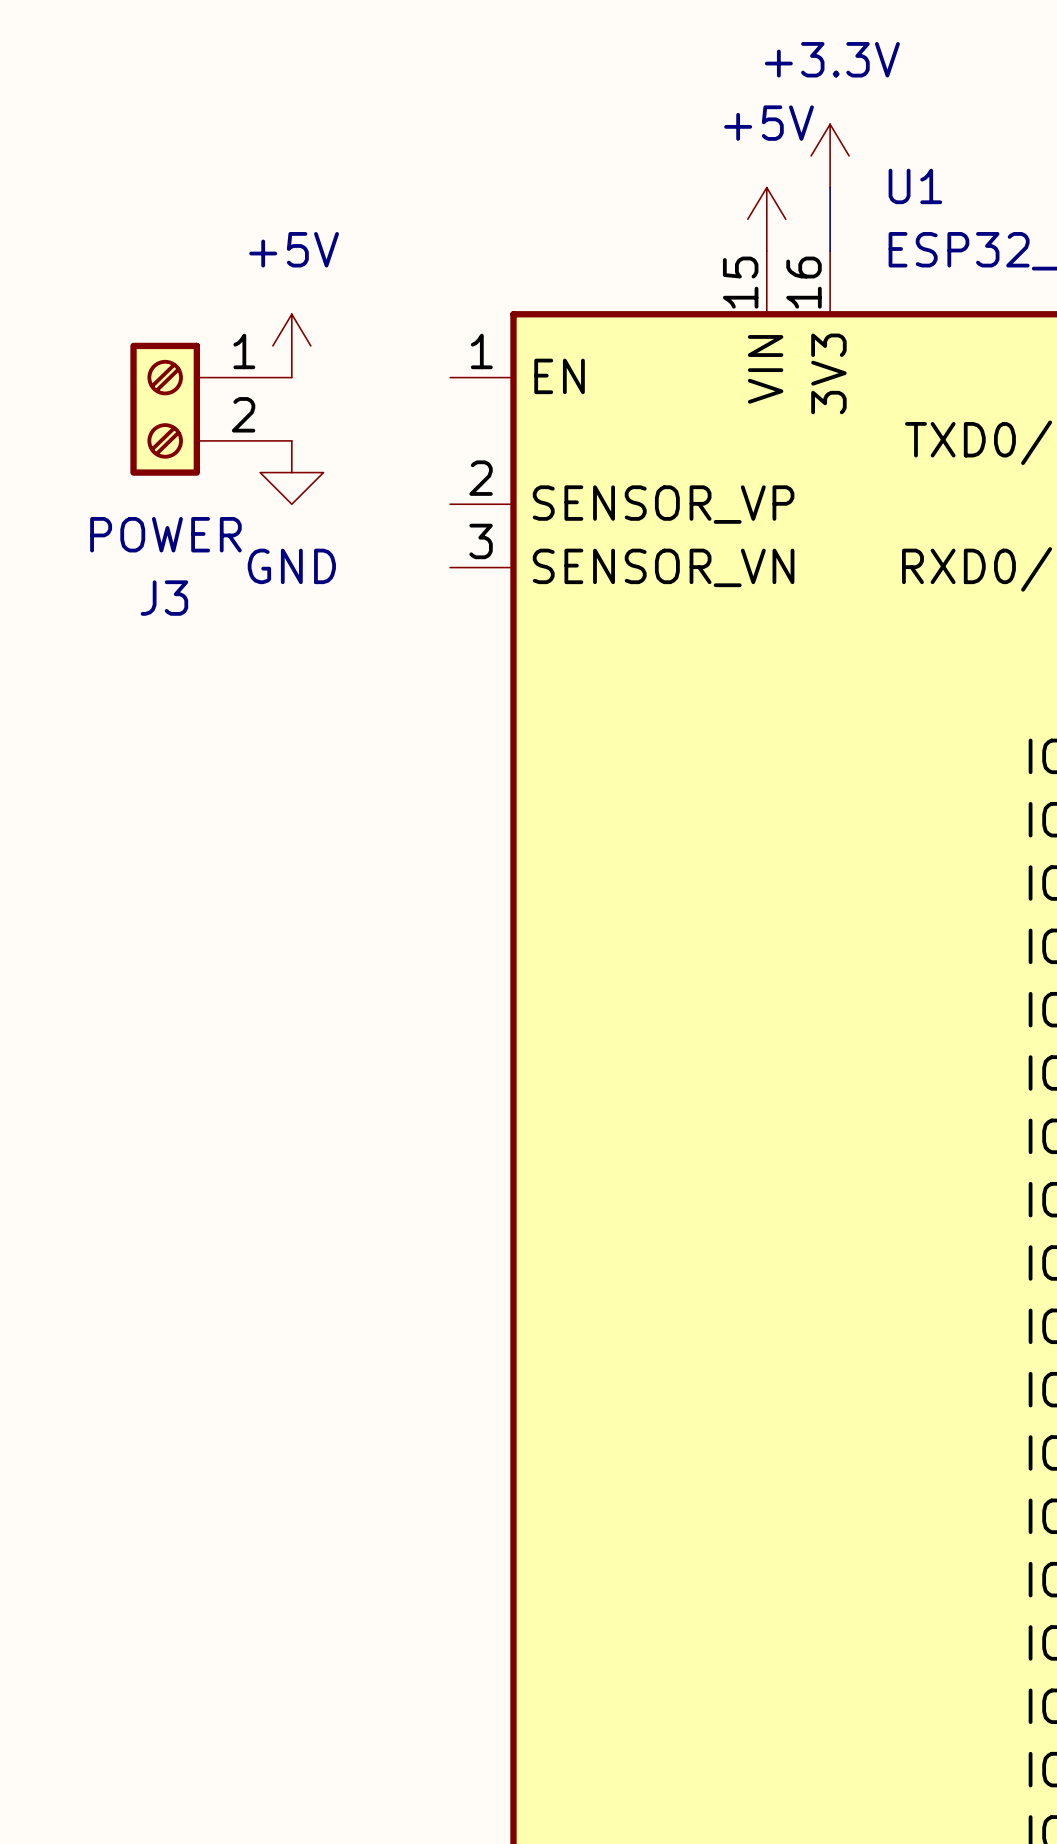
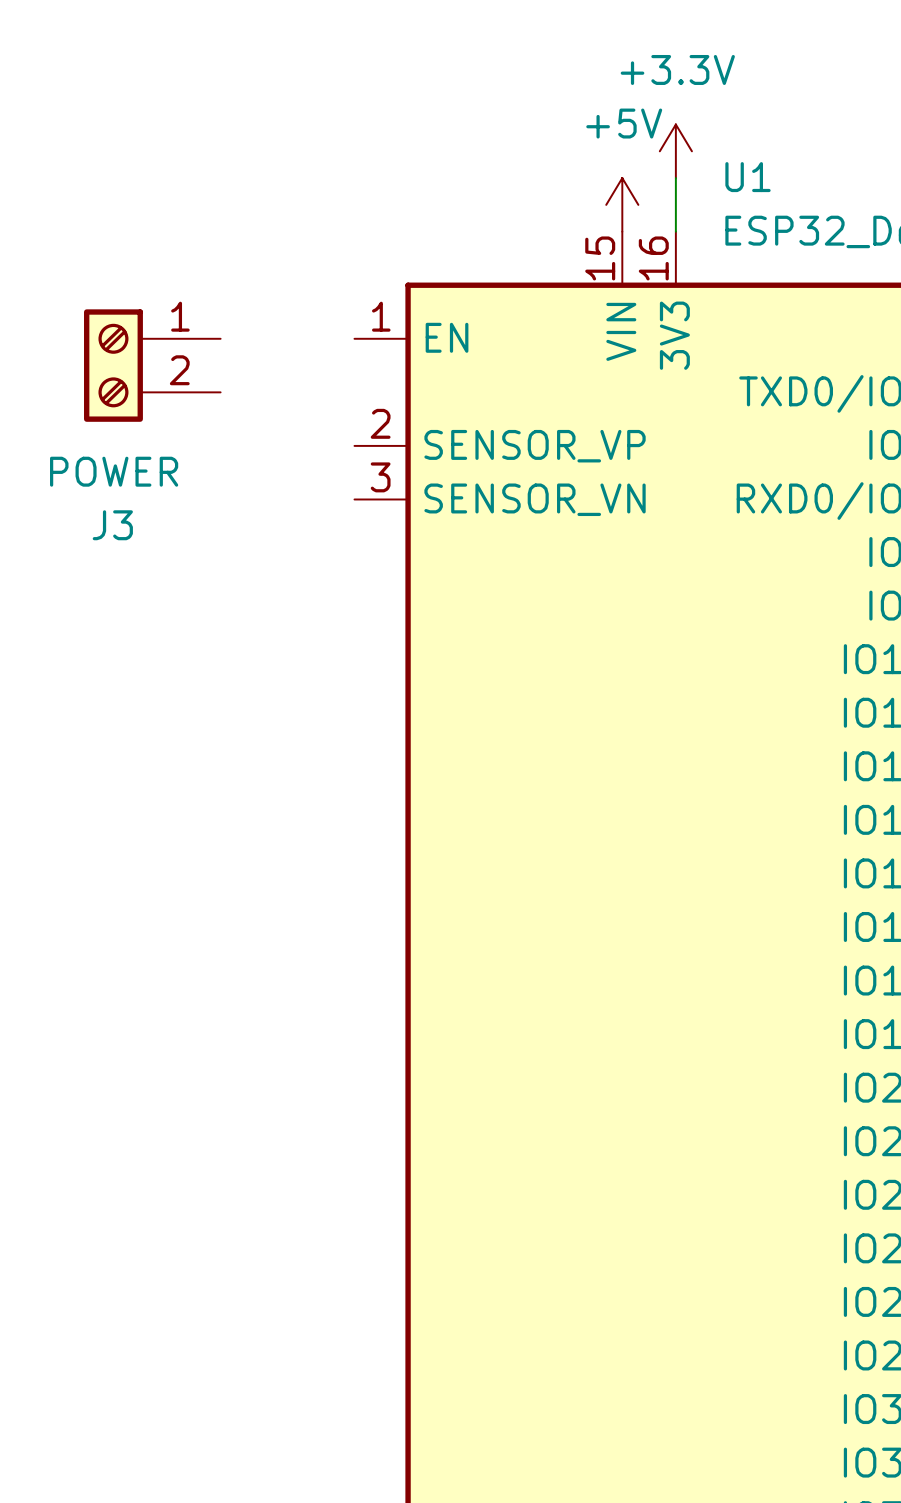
power symbol: +5V (291, 345) -> none
power symbol: GND (291, 472) -> none

